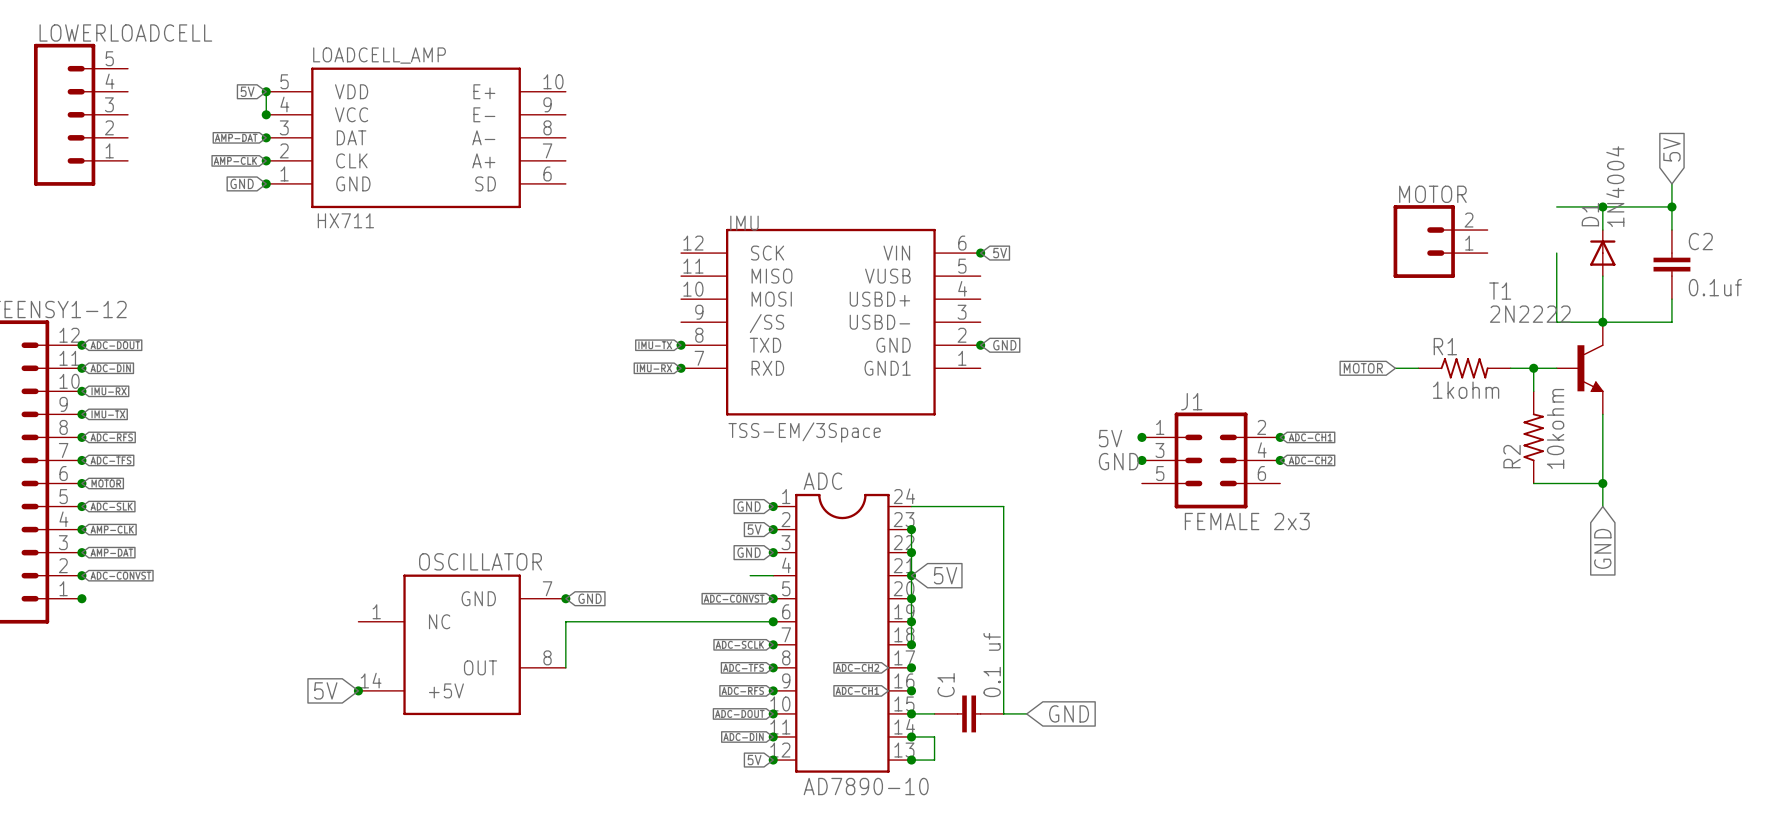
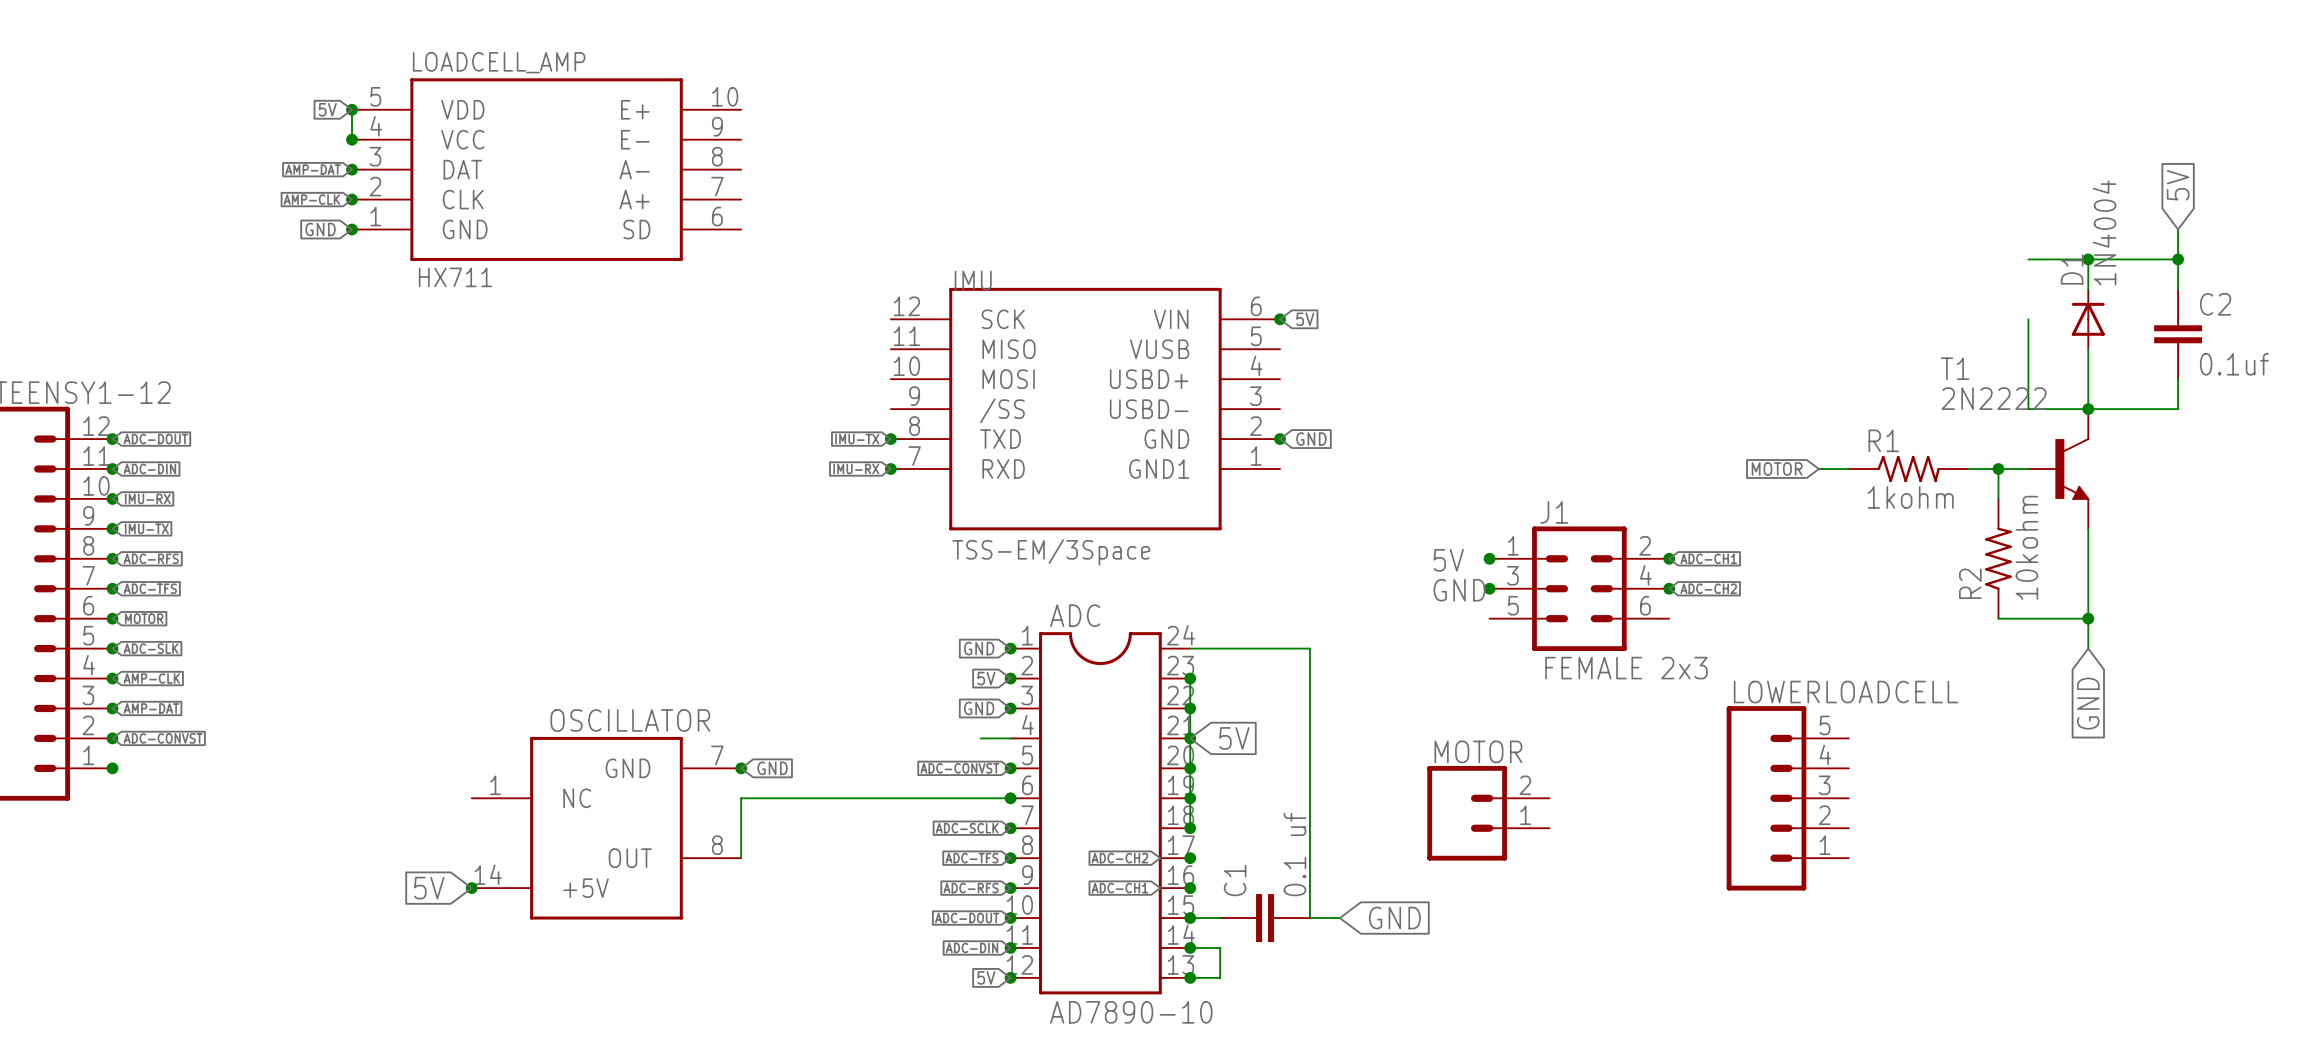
LOWERLOADCELL: (80, 114) -> none
MOTOR: (1440, 241) -> none
LOWERLOADCELL: none -> (1787, 798)
MOTOR: none -> (1488, 813)

